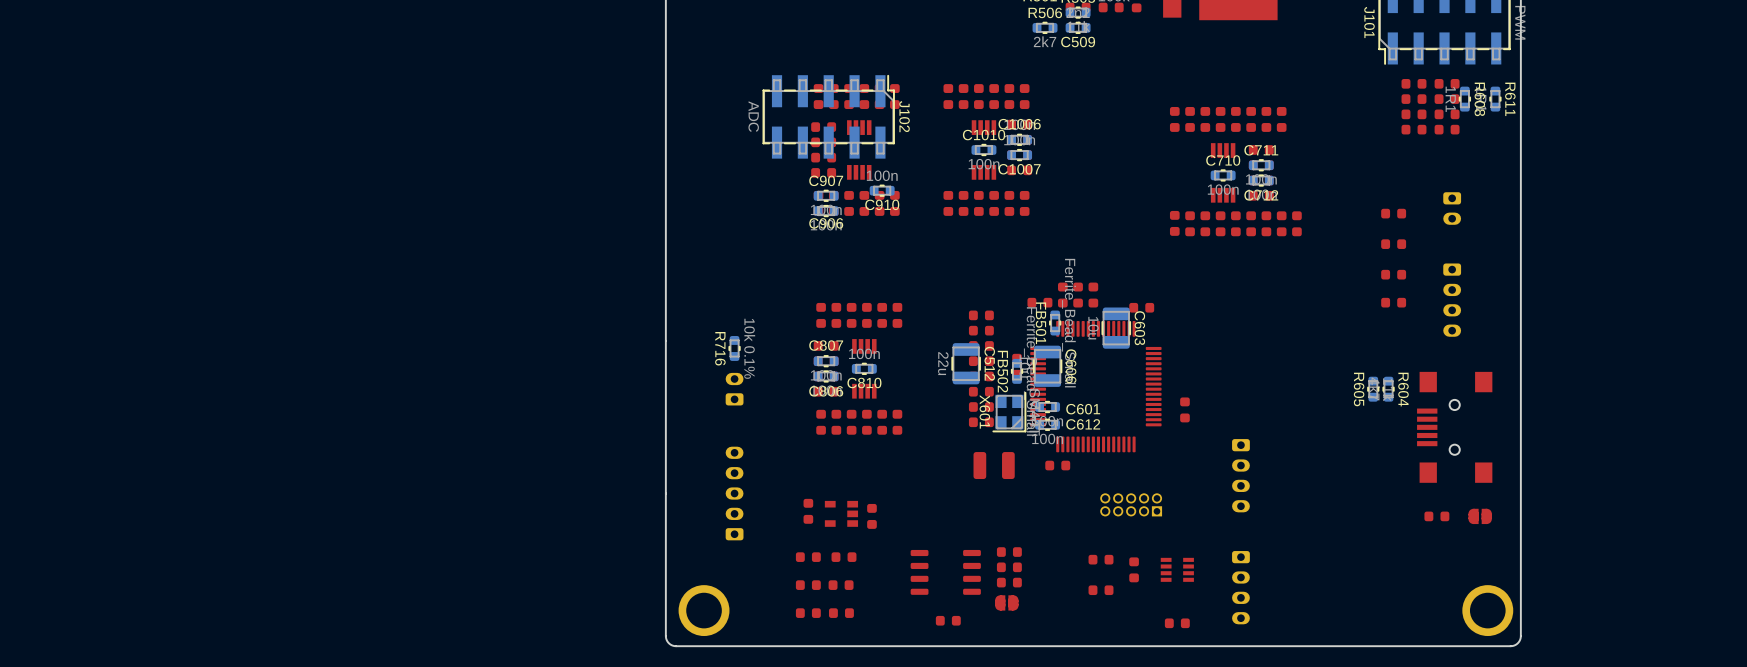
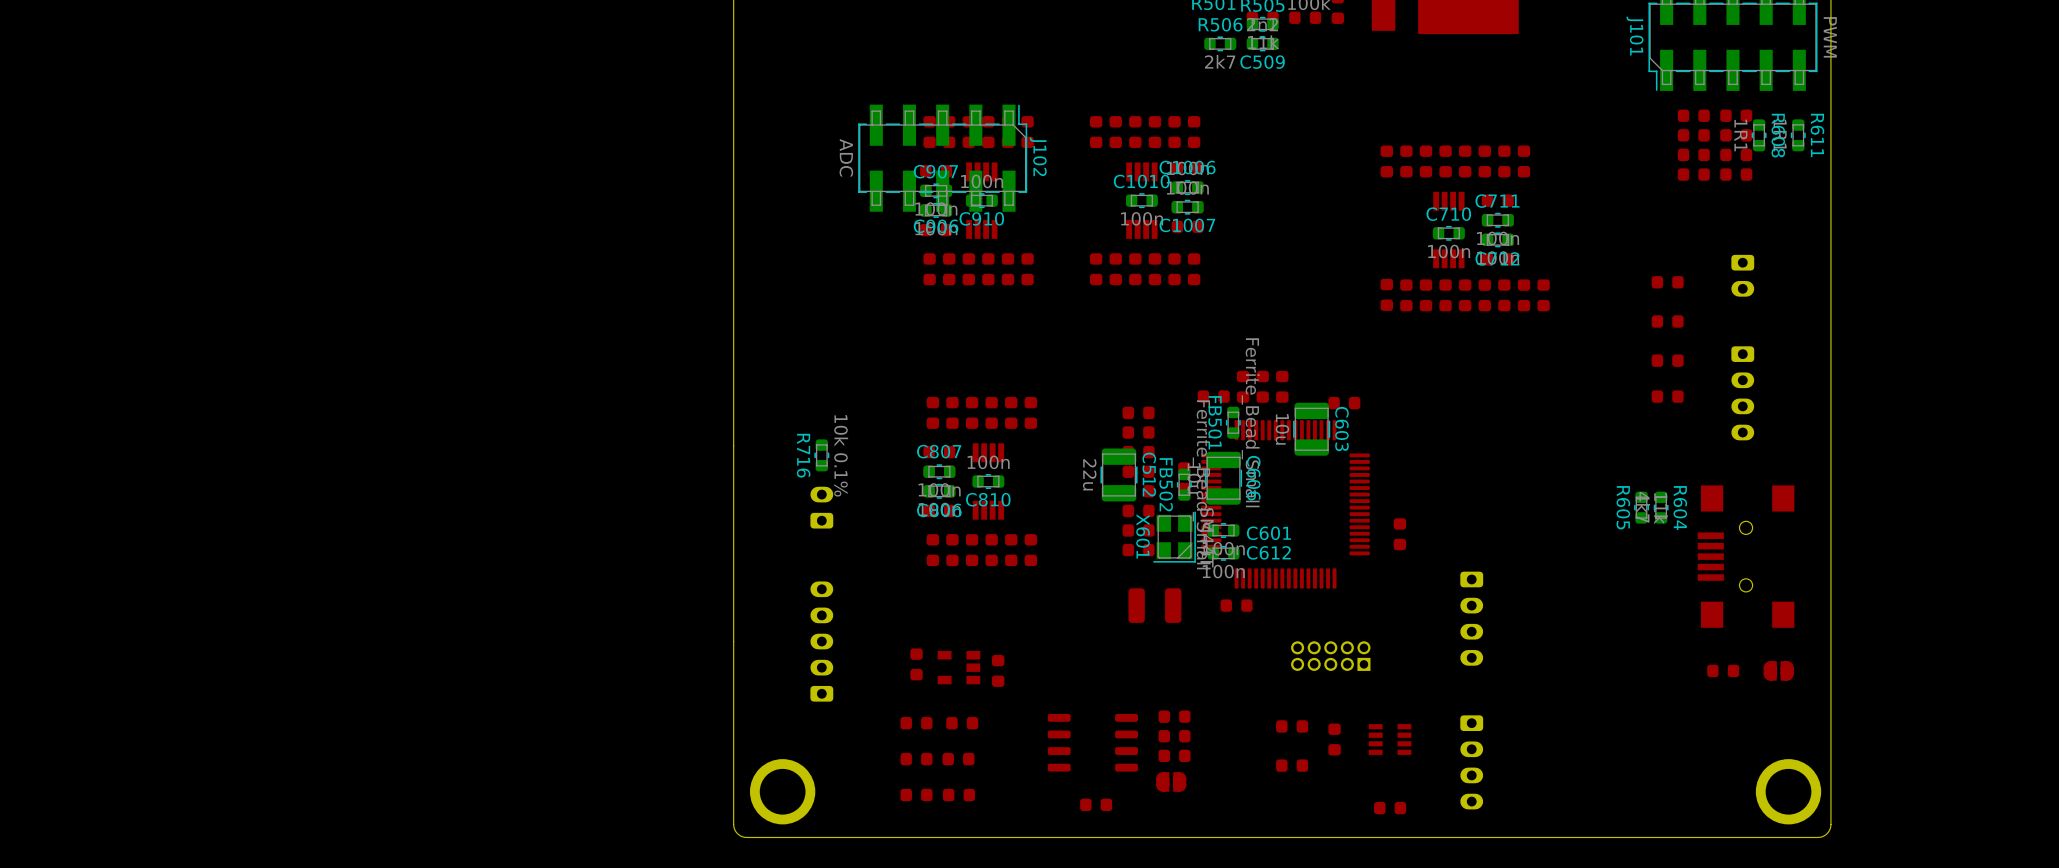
C910 position: (882, 190) -> (981, 200)
C907 position: (826, 195) -> (936, 190)
C906 position: (826, 211) -> (936, 210)

